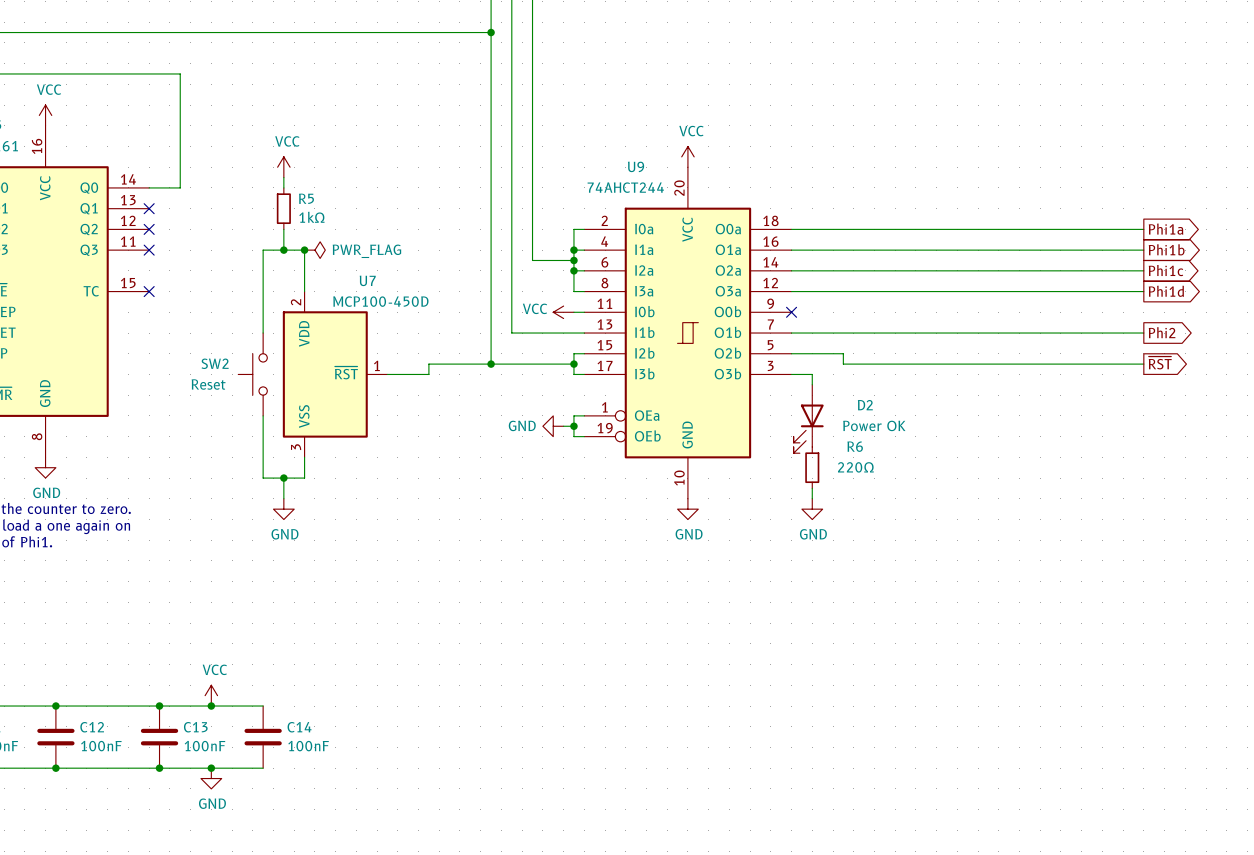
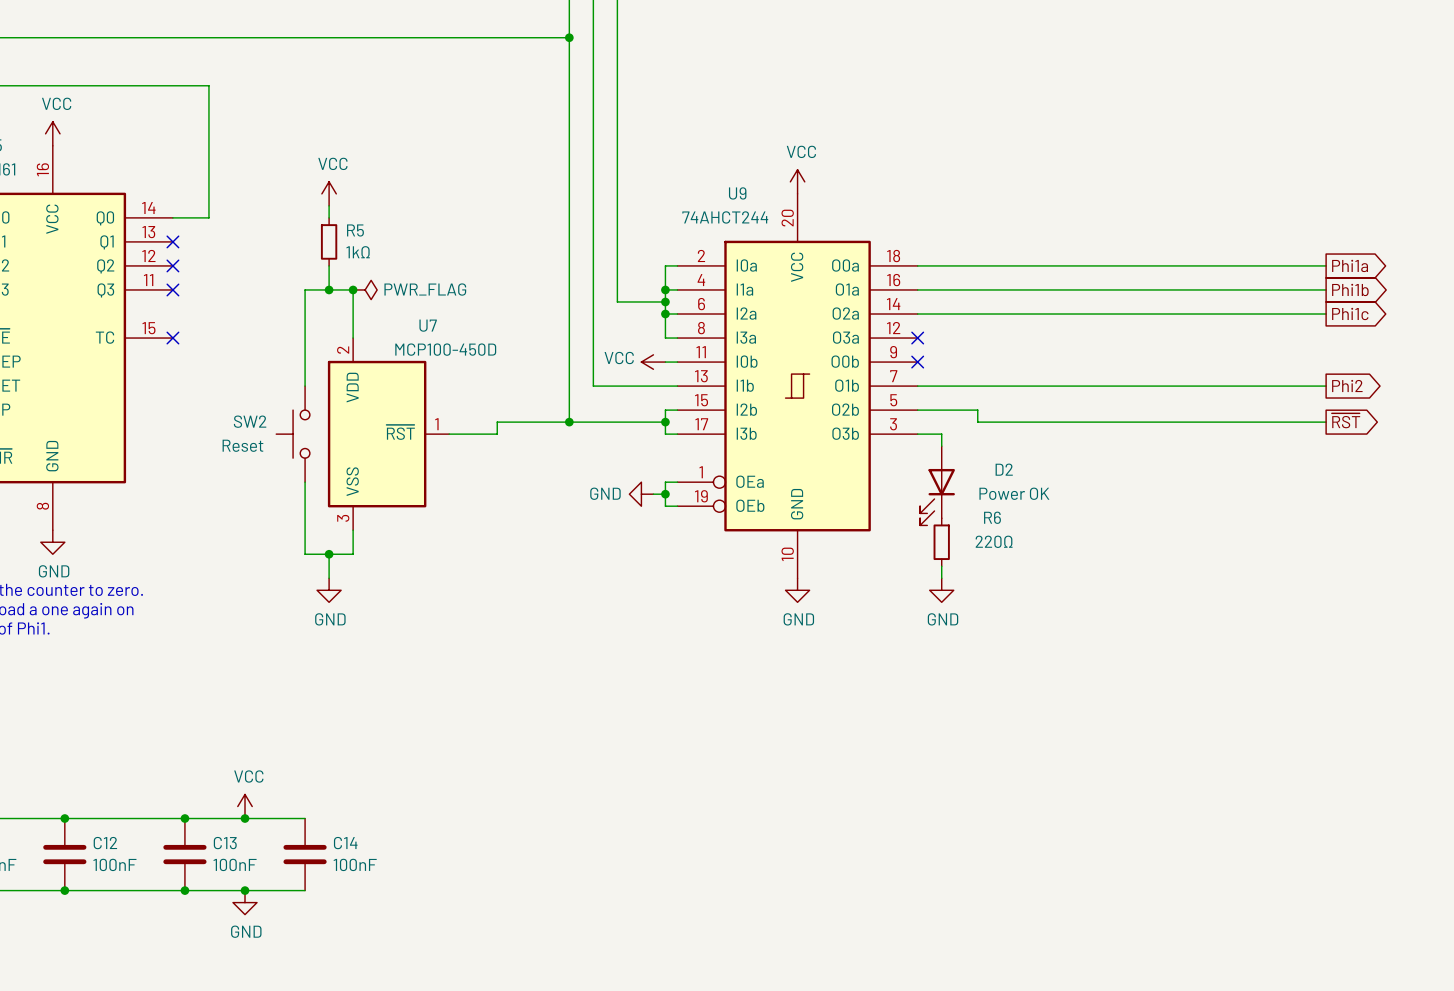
wire: (791, 291) (1143, 291) -> none
no-connect mark: none -> (917, 338)
global label: Phi1d (1166, 291) -> none

